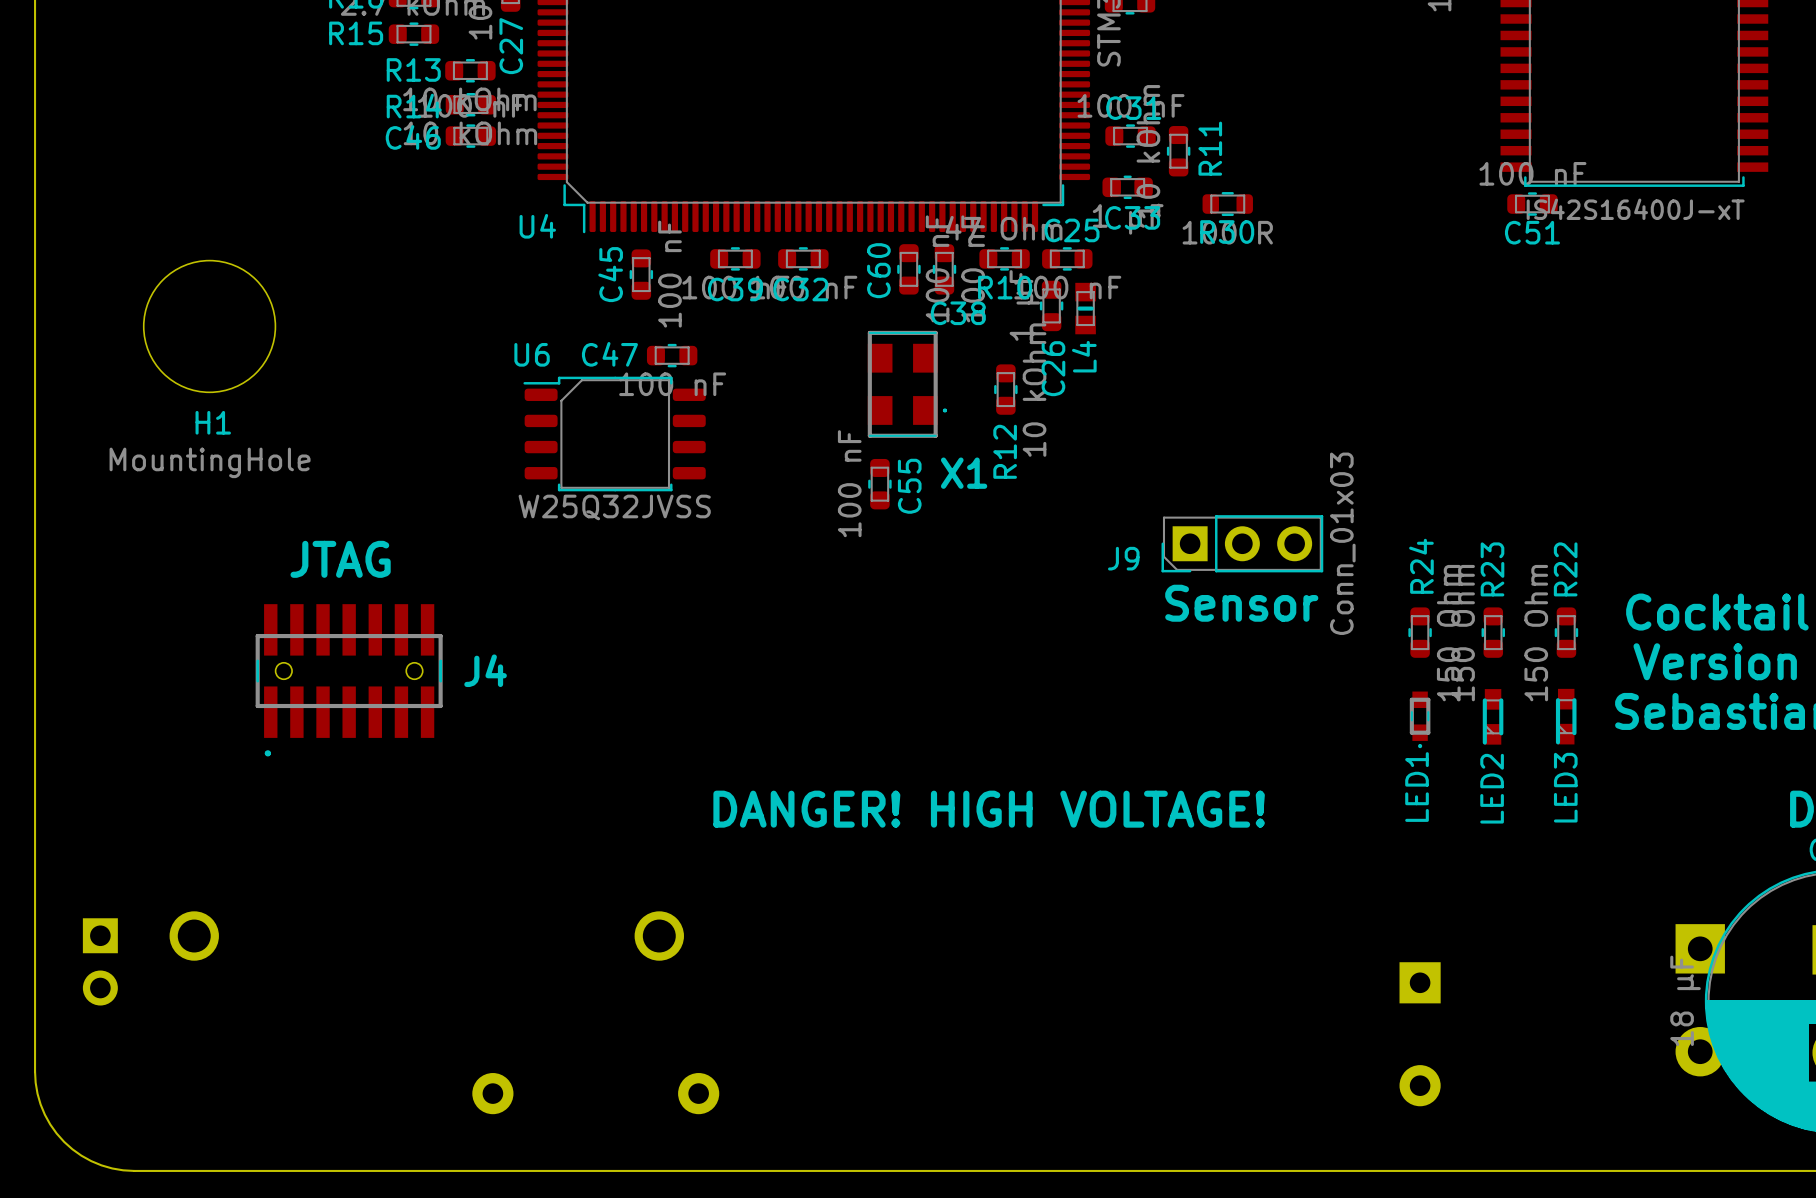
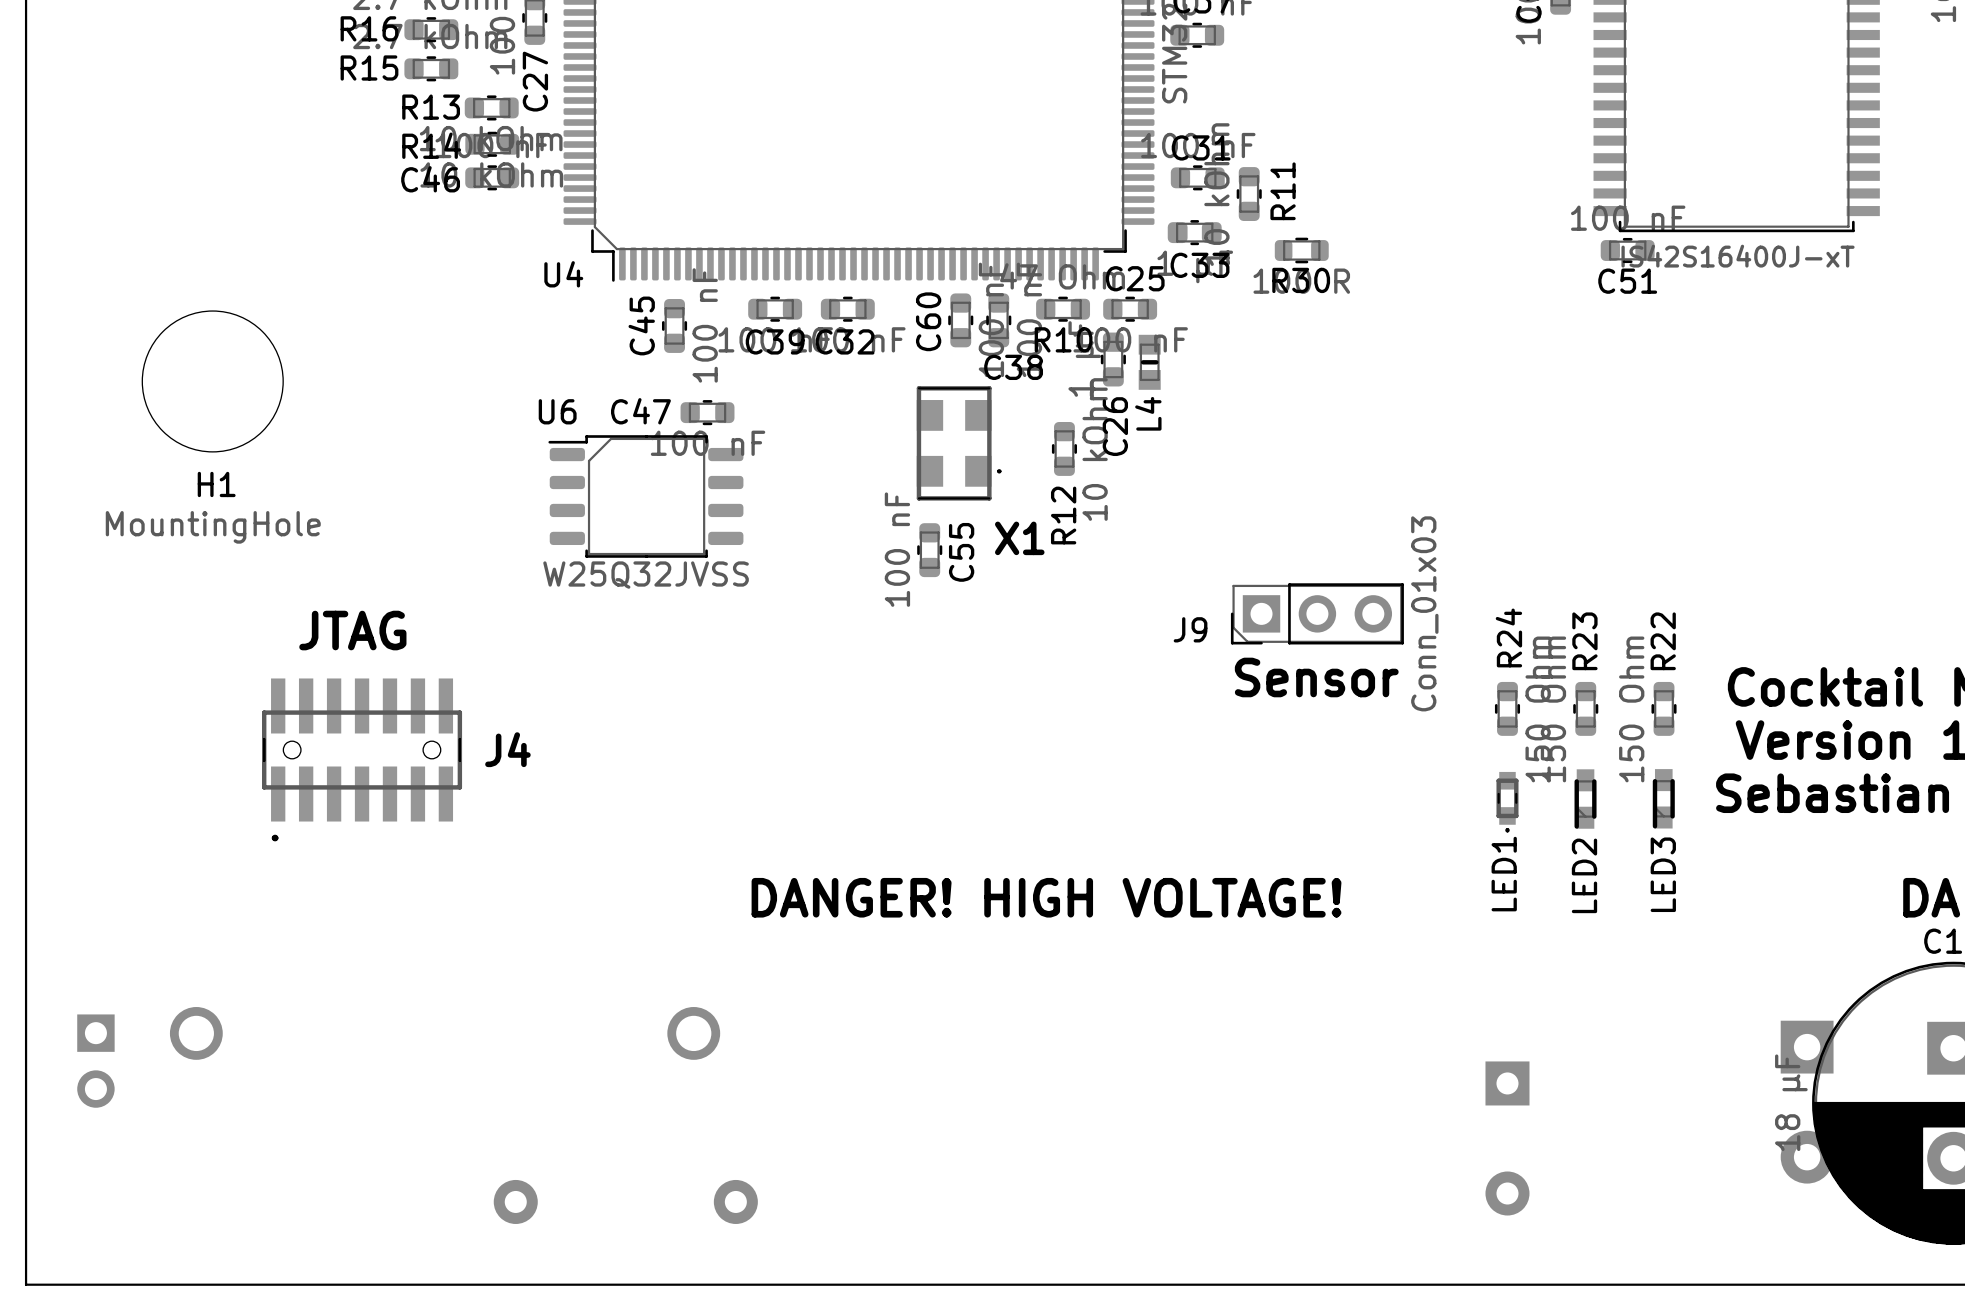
board edge: (35, 1071) (37, 1093) (44, 1114) (64, 1141) (91, 1161) (112, 1168) (134, 1170) -> (26, 1178) (26, 1284) (132, 1284)

